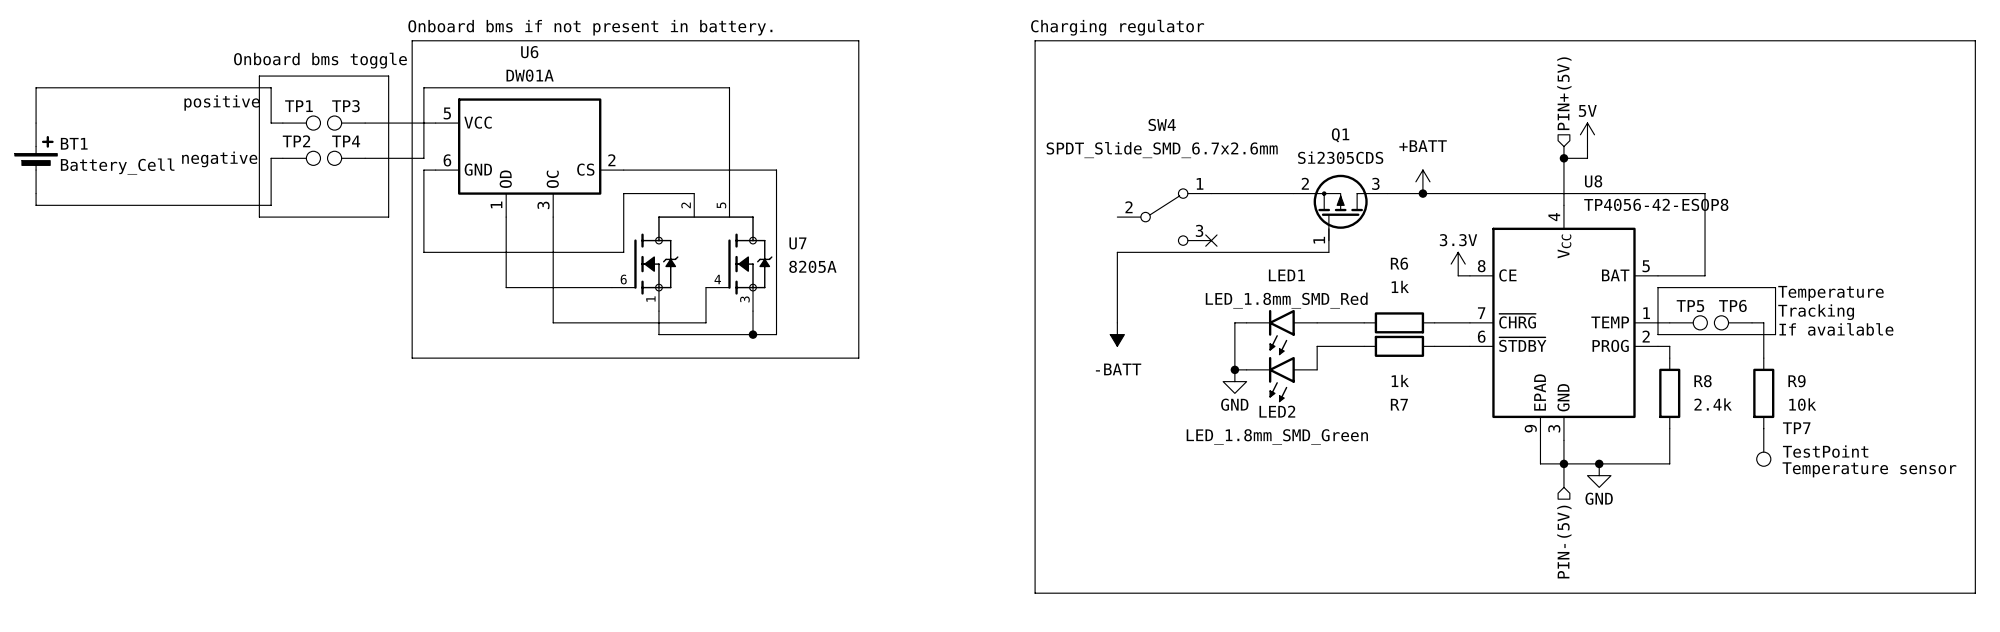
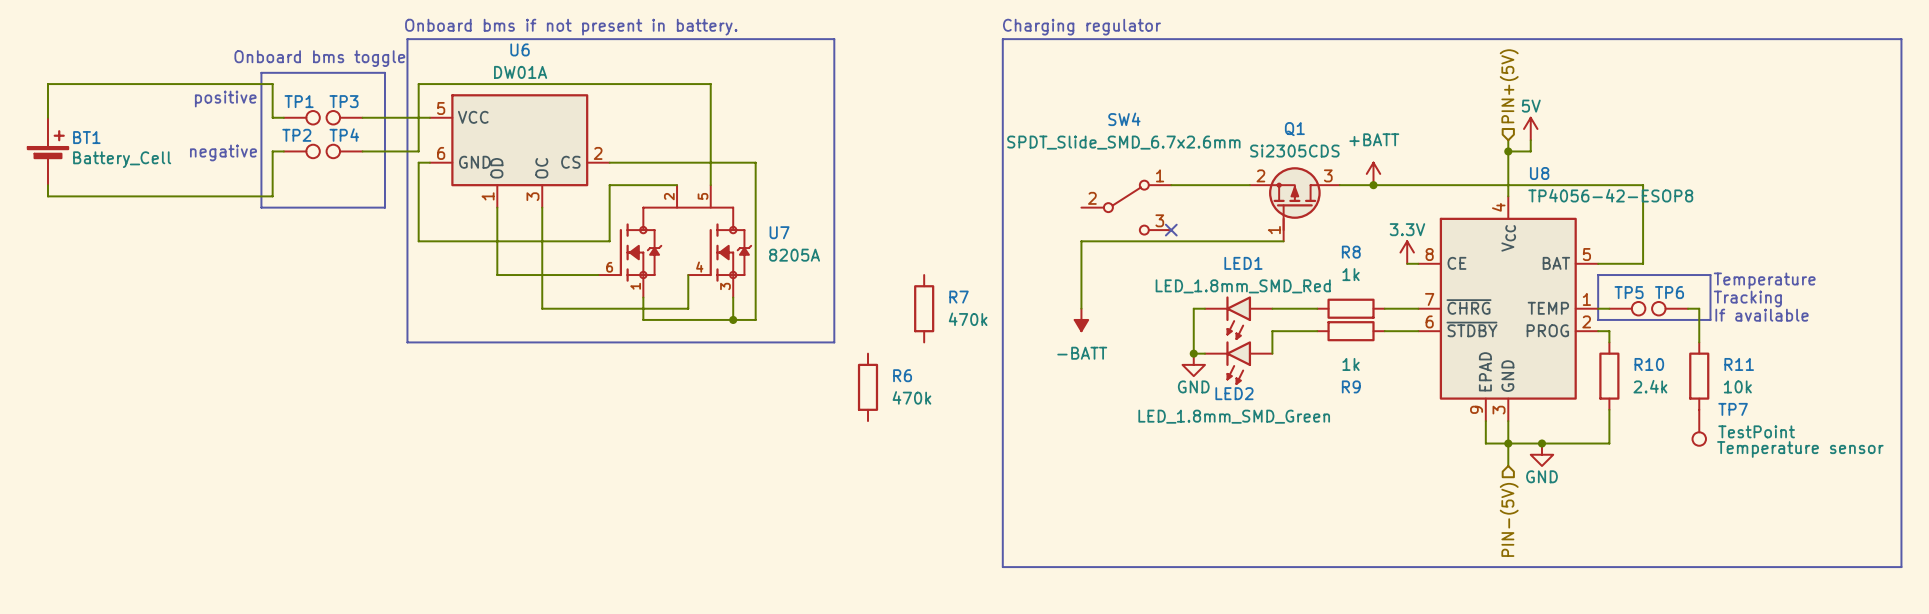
R6 name: R6 (1399, 263) -> R8 (1351, 252)
R7: none -> (924, 308)
R8 name: R8 (1703, 381) -> R10 (1649, 364)
R9 name: R9 (1797, 381) -> R11 (1739, 364)
R7 name: R7 (1399, 404) -> R9 (1351, 386)
R6: none -> (868, 387)

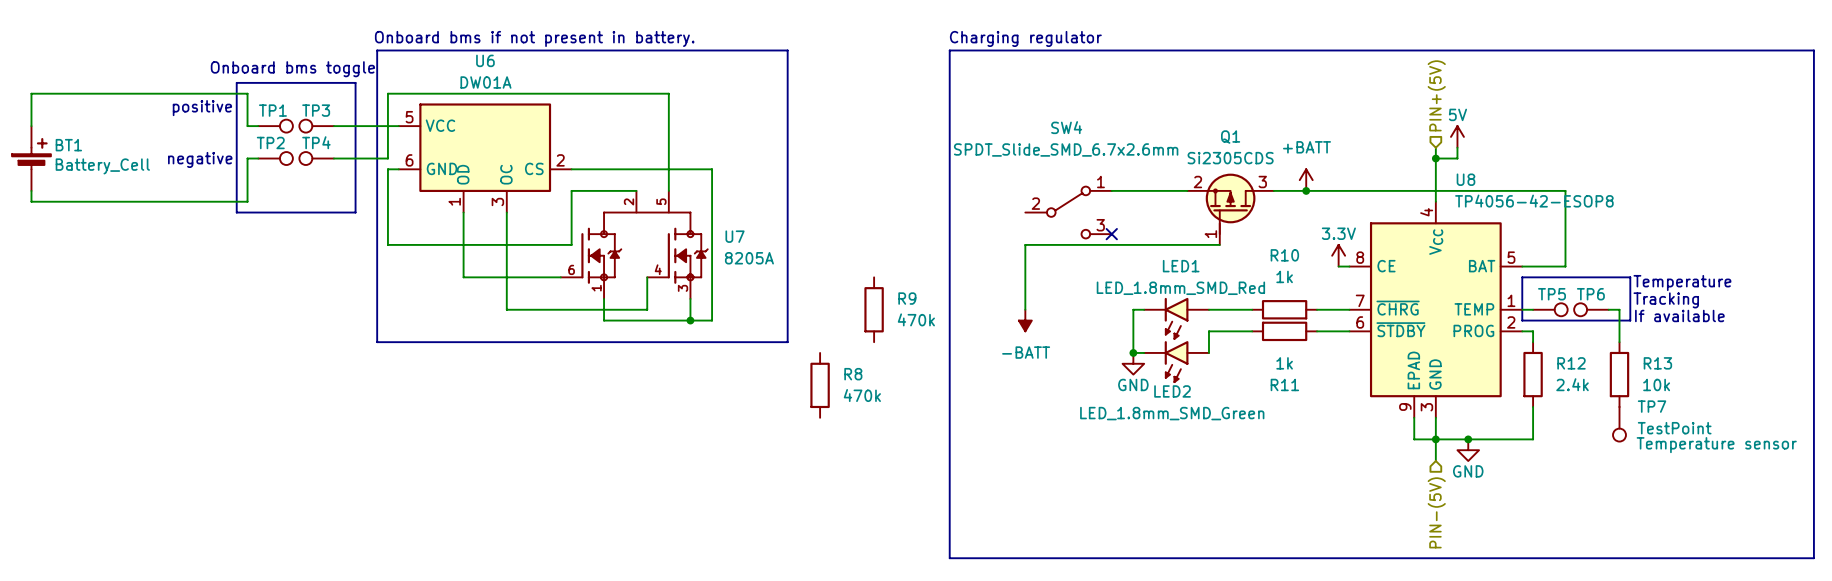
R8 name: R8 (1351, 252) -> R10 (1284, 255)
R7 name: R7 (959, 297) -> R9 (907, 298)
R10 name: R10 (1649, 364) -> R12 (1571, 363)
R11 name: R11 (1739, 364) -> R13 (1657, 363)
R6 name: R6 (902, 375) -> R8 (853, 374)
R9 name: R9 (1351, 386) -> R11 (1284, 384)

